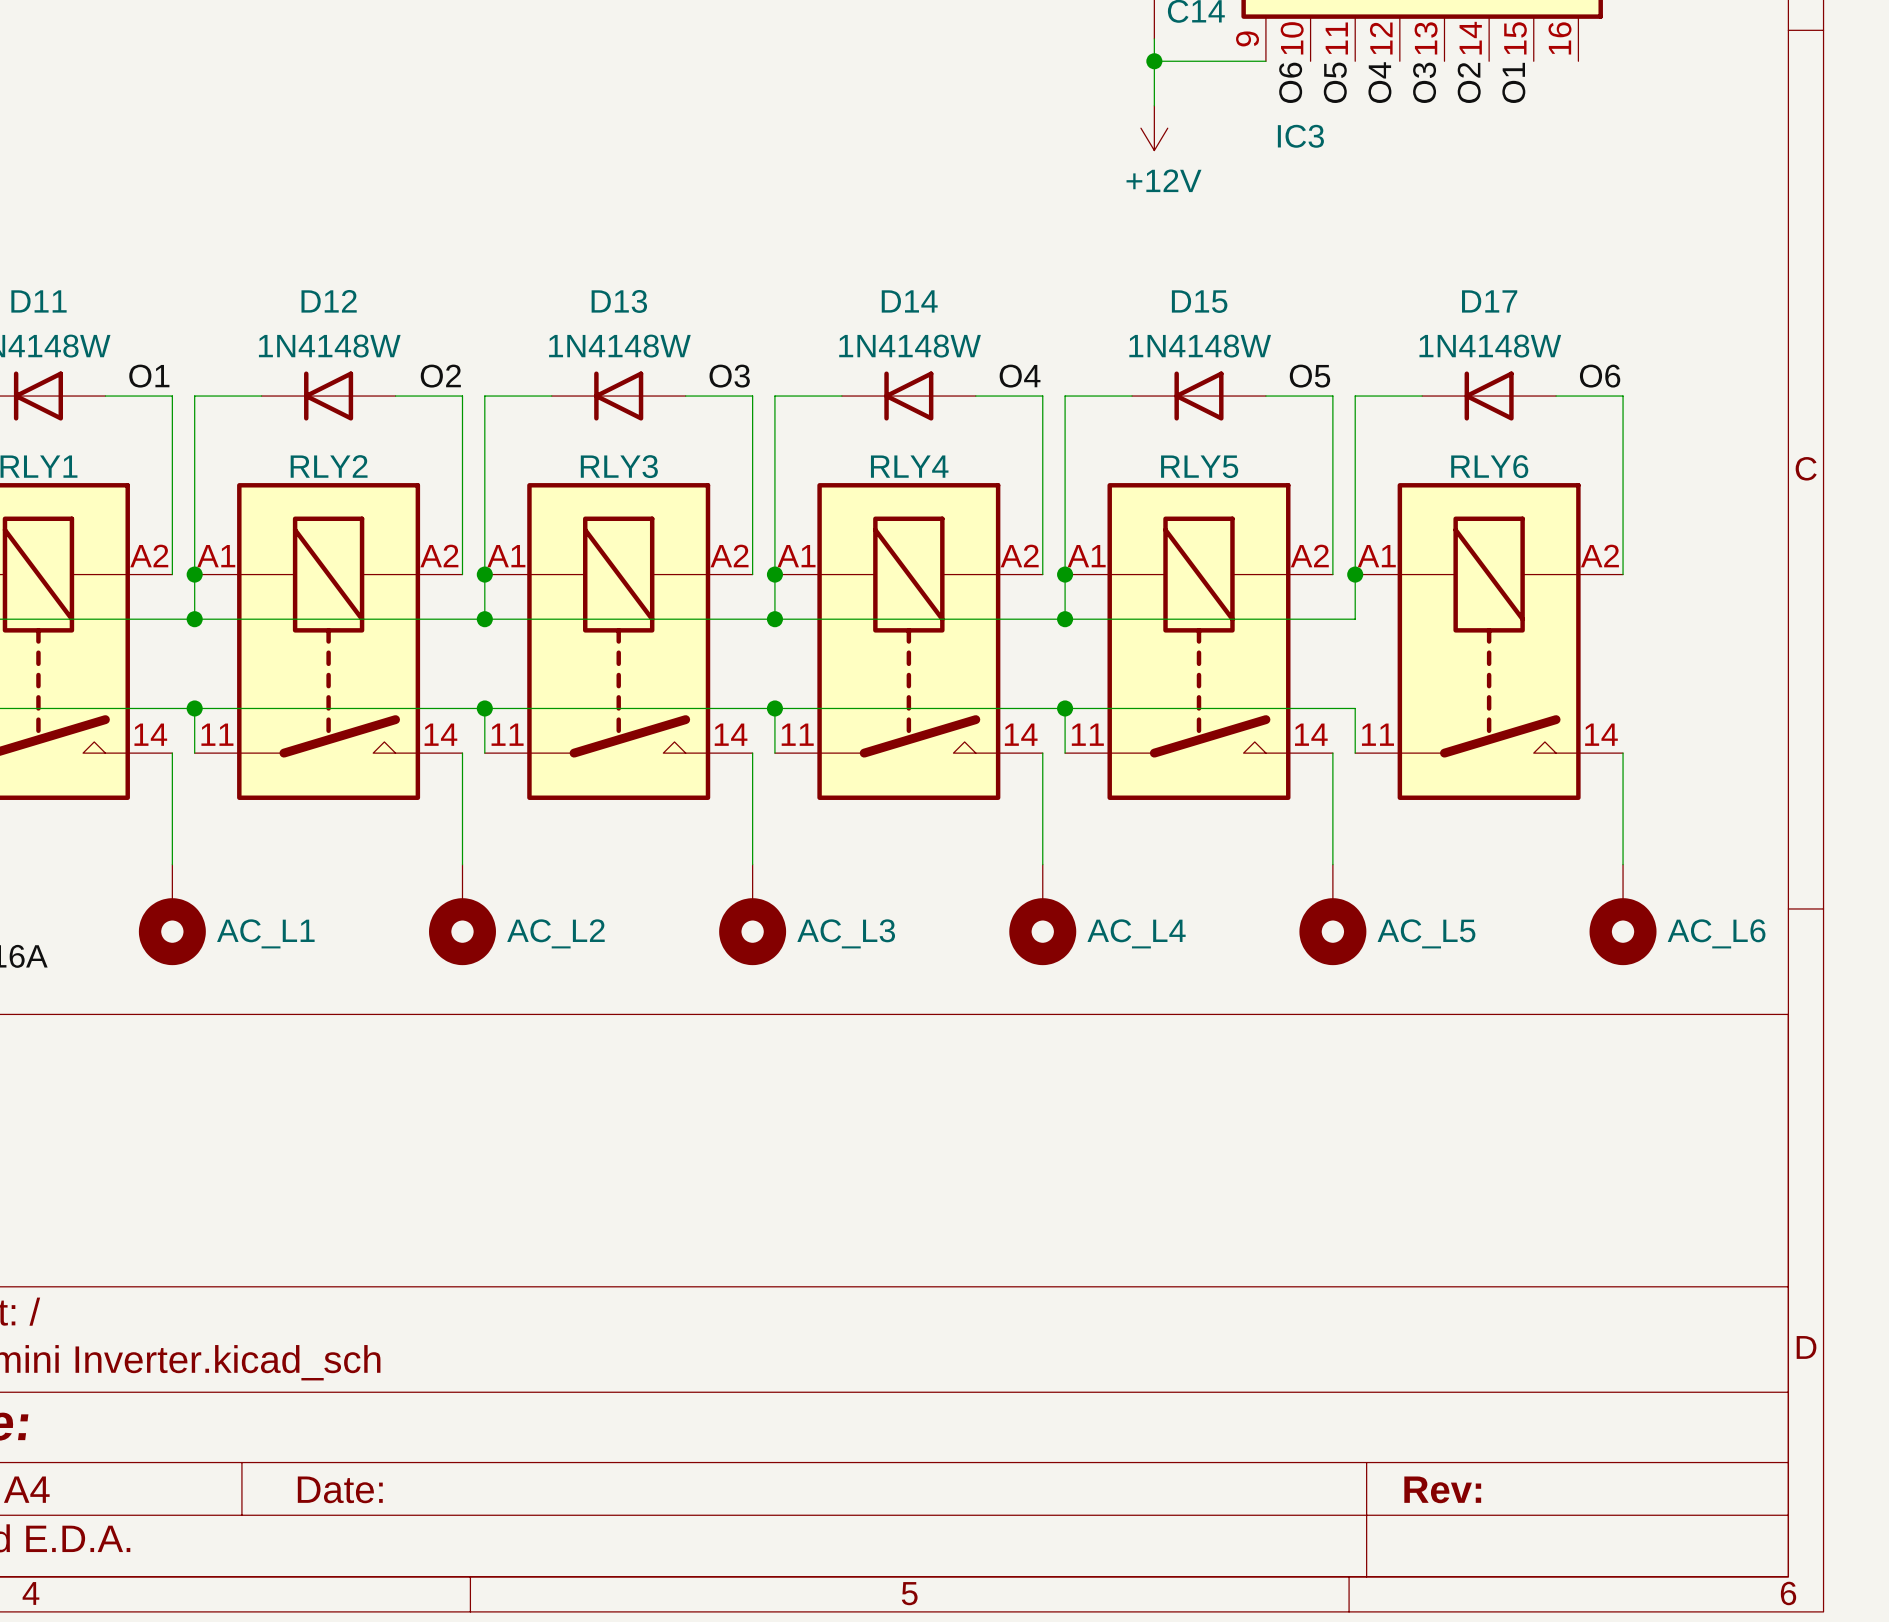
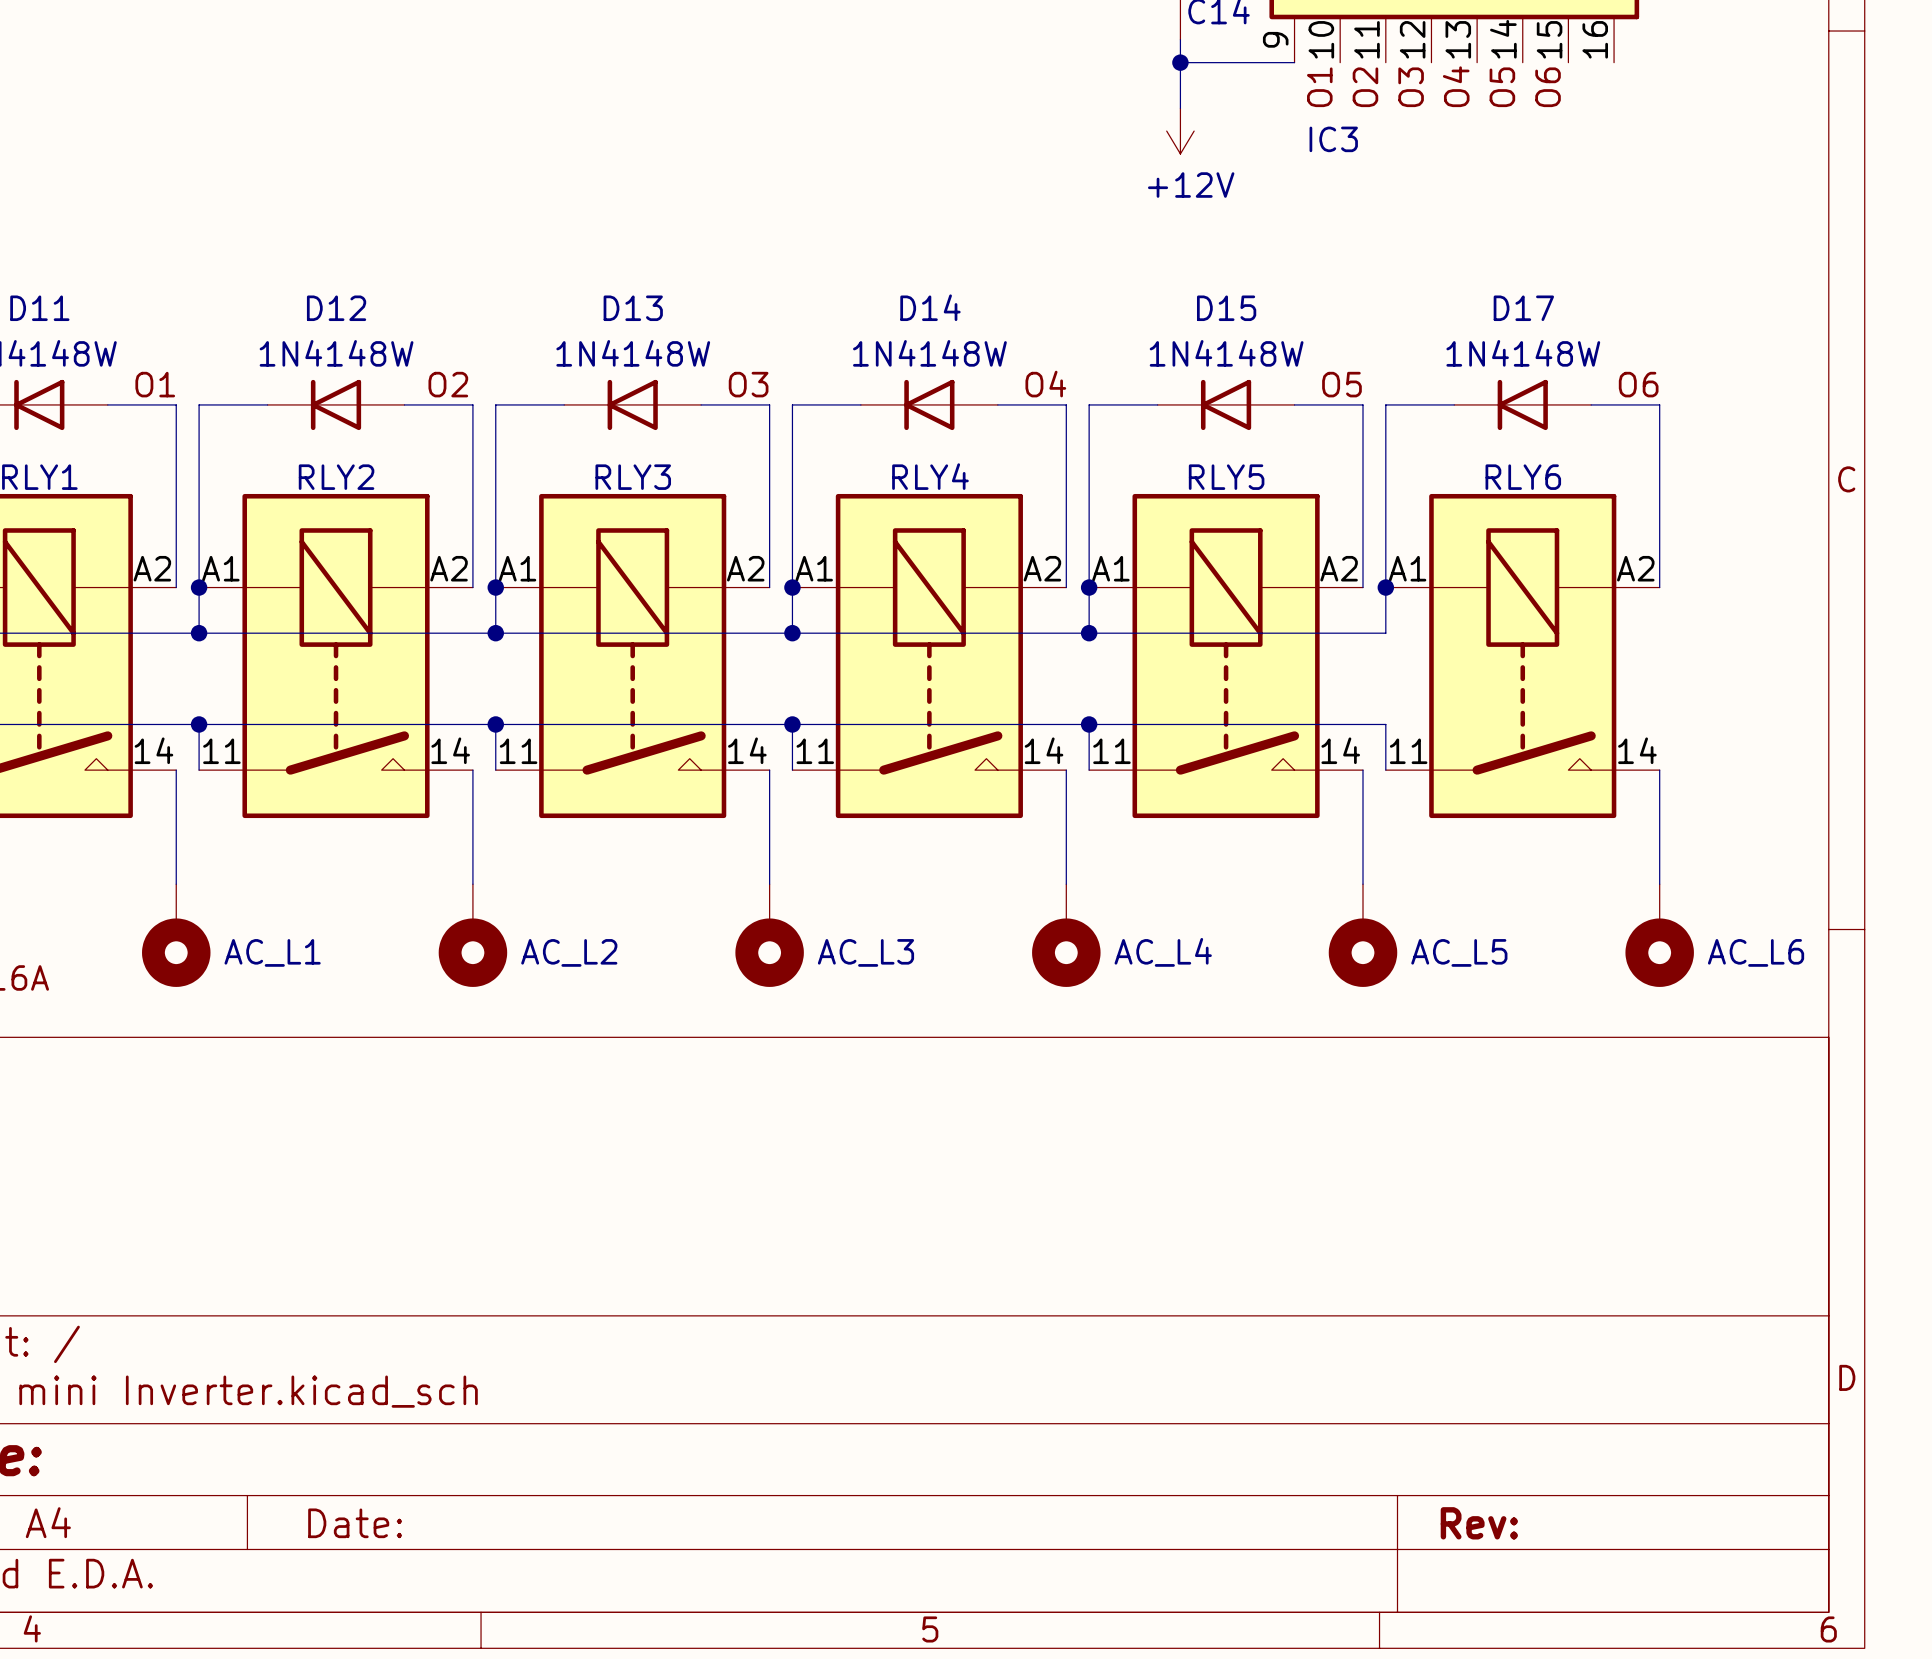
label: O6 (1290, 82) -> O1 (1319, 87)
label: O5 (1335, 82) -> O2 (1365, 87)
label: O4 (1379, 82) -> O3 (1411, 87)
label: O3 (1424, 82) -> O4 (1456, 86)
label: O2 (1469, 82) -> O5 (1502, 87)
label: O1 (1513, 82) -> O6 (1548, 87)

